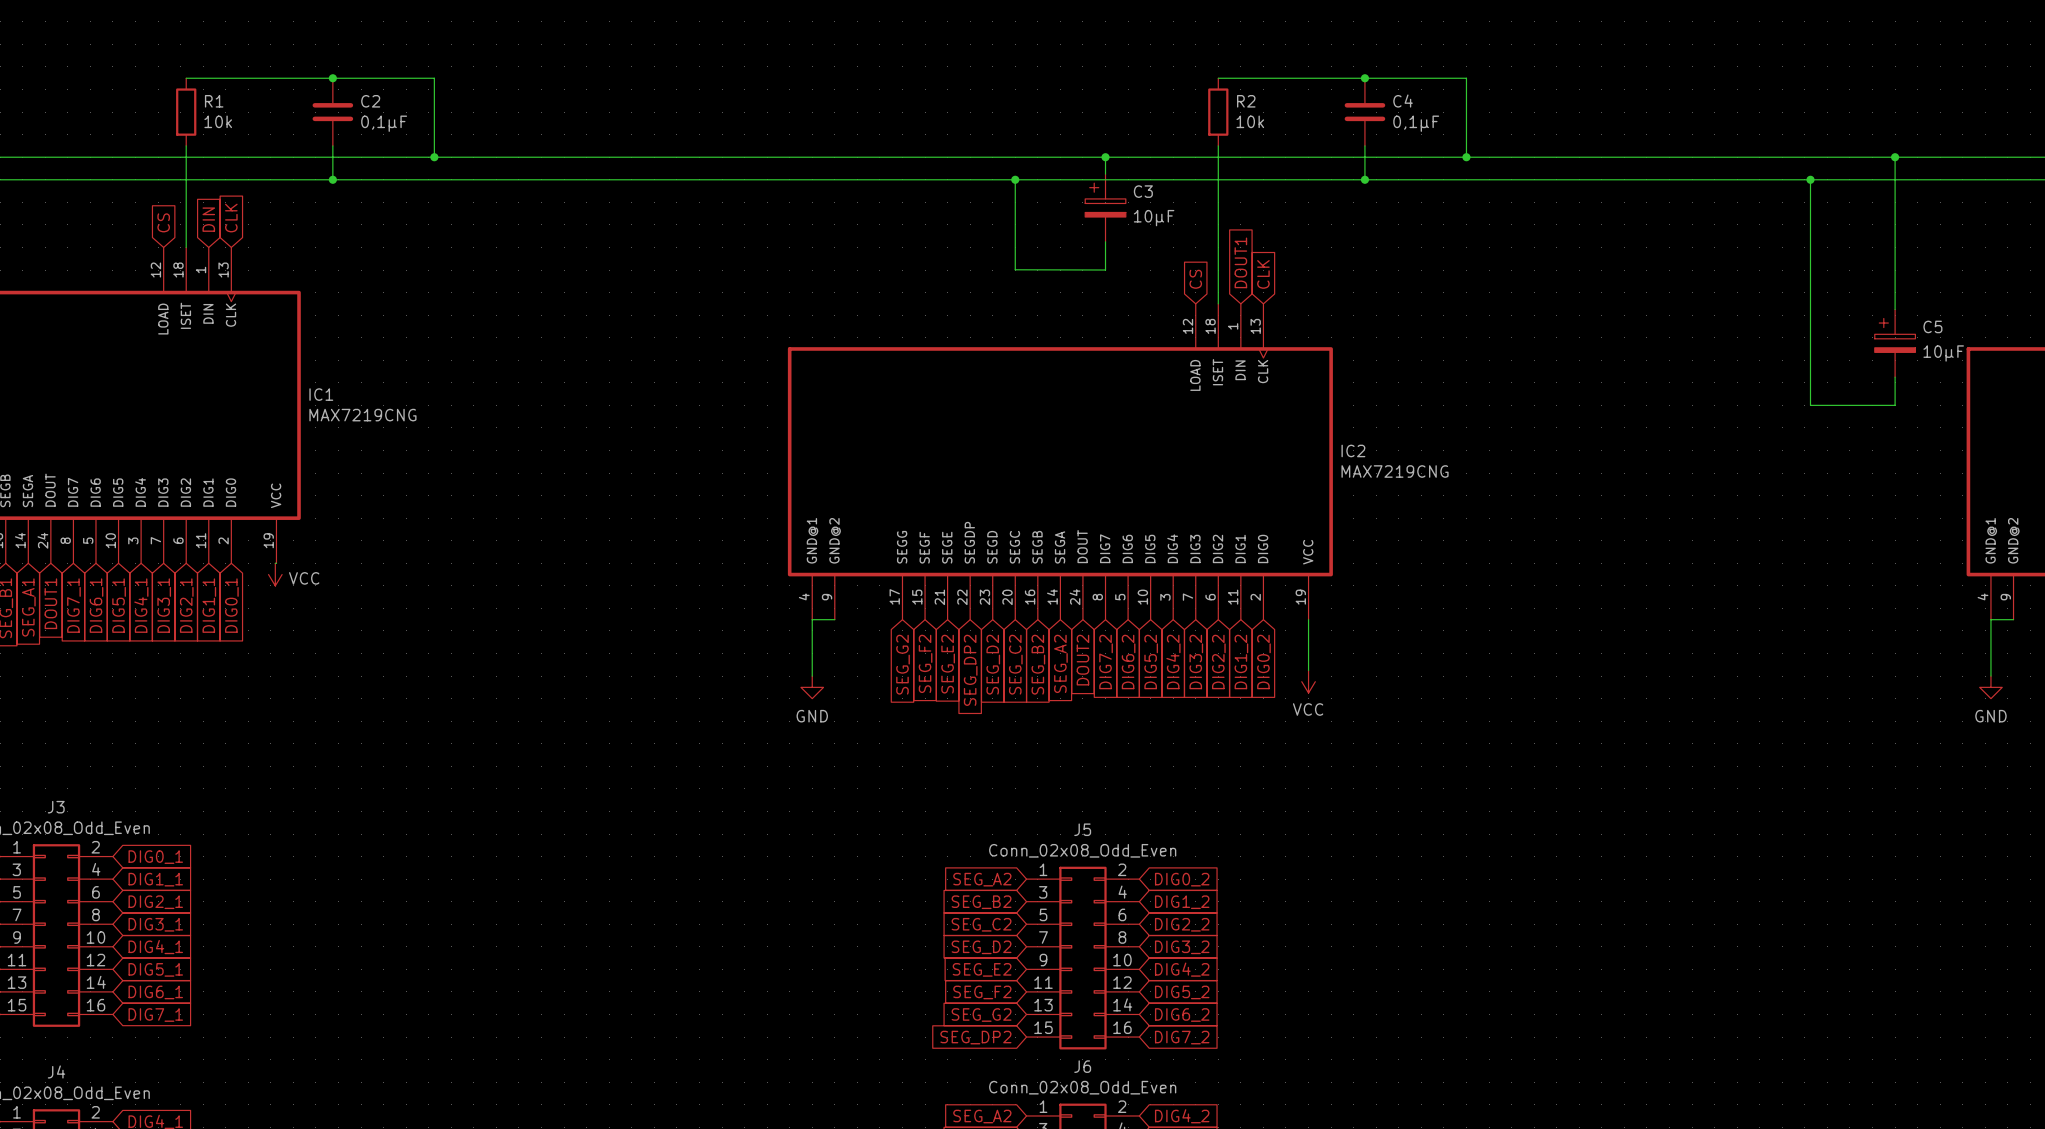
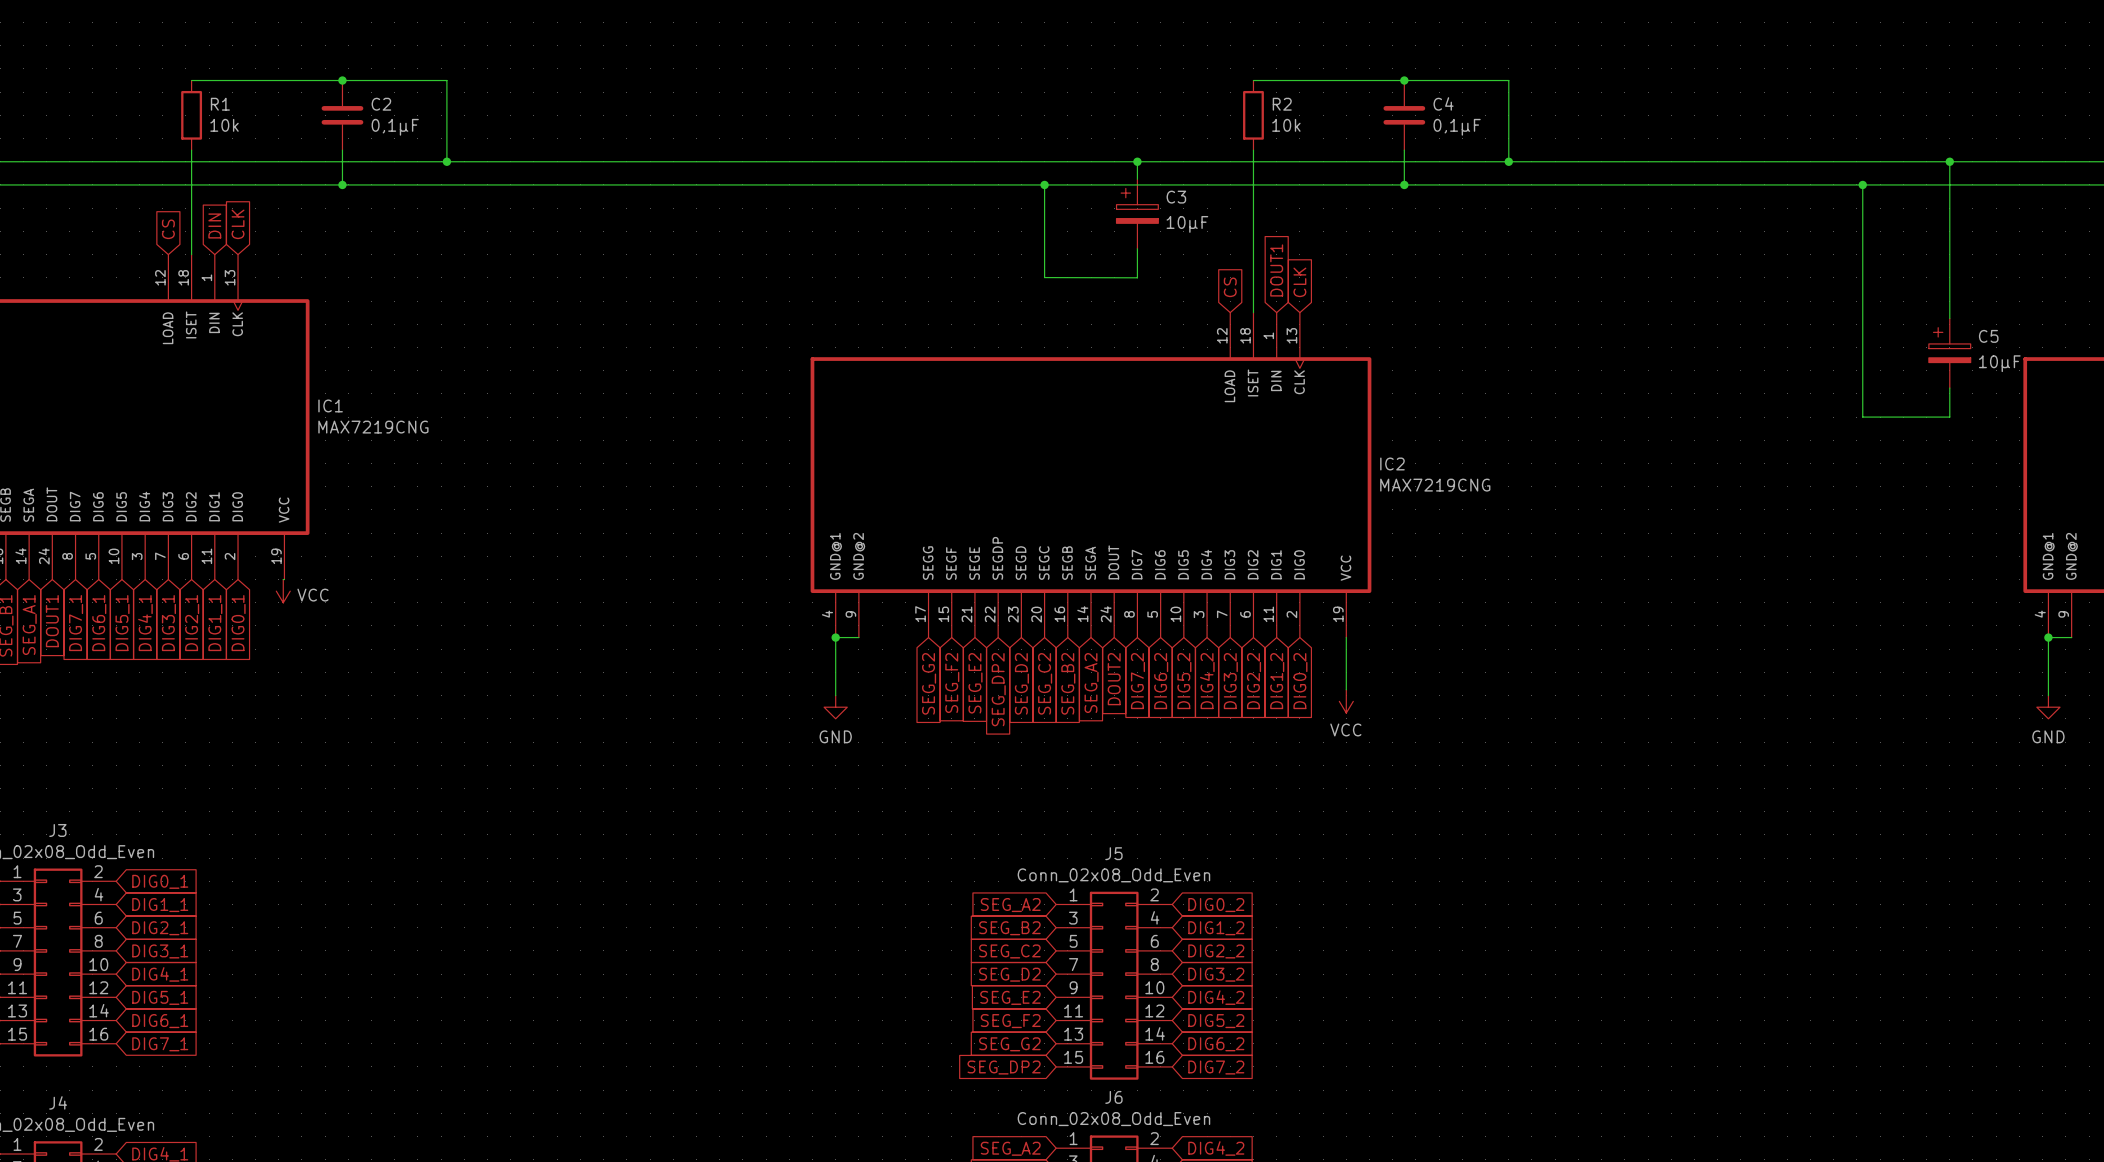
junction: none -> (835, 637)
junction: none -> (2048, 637)

